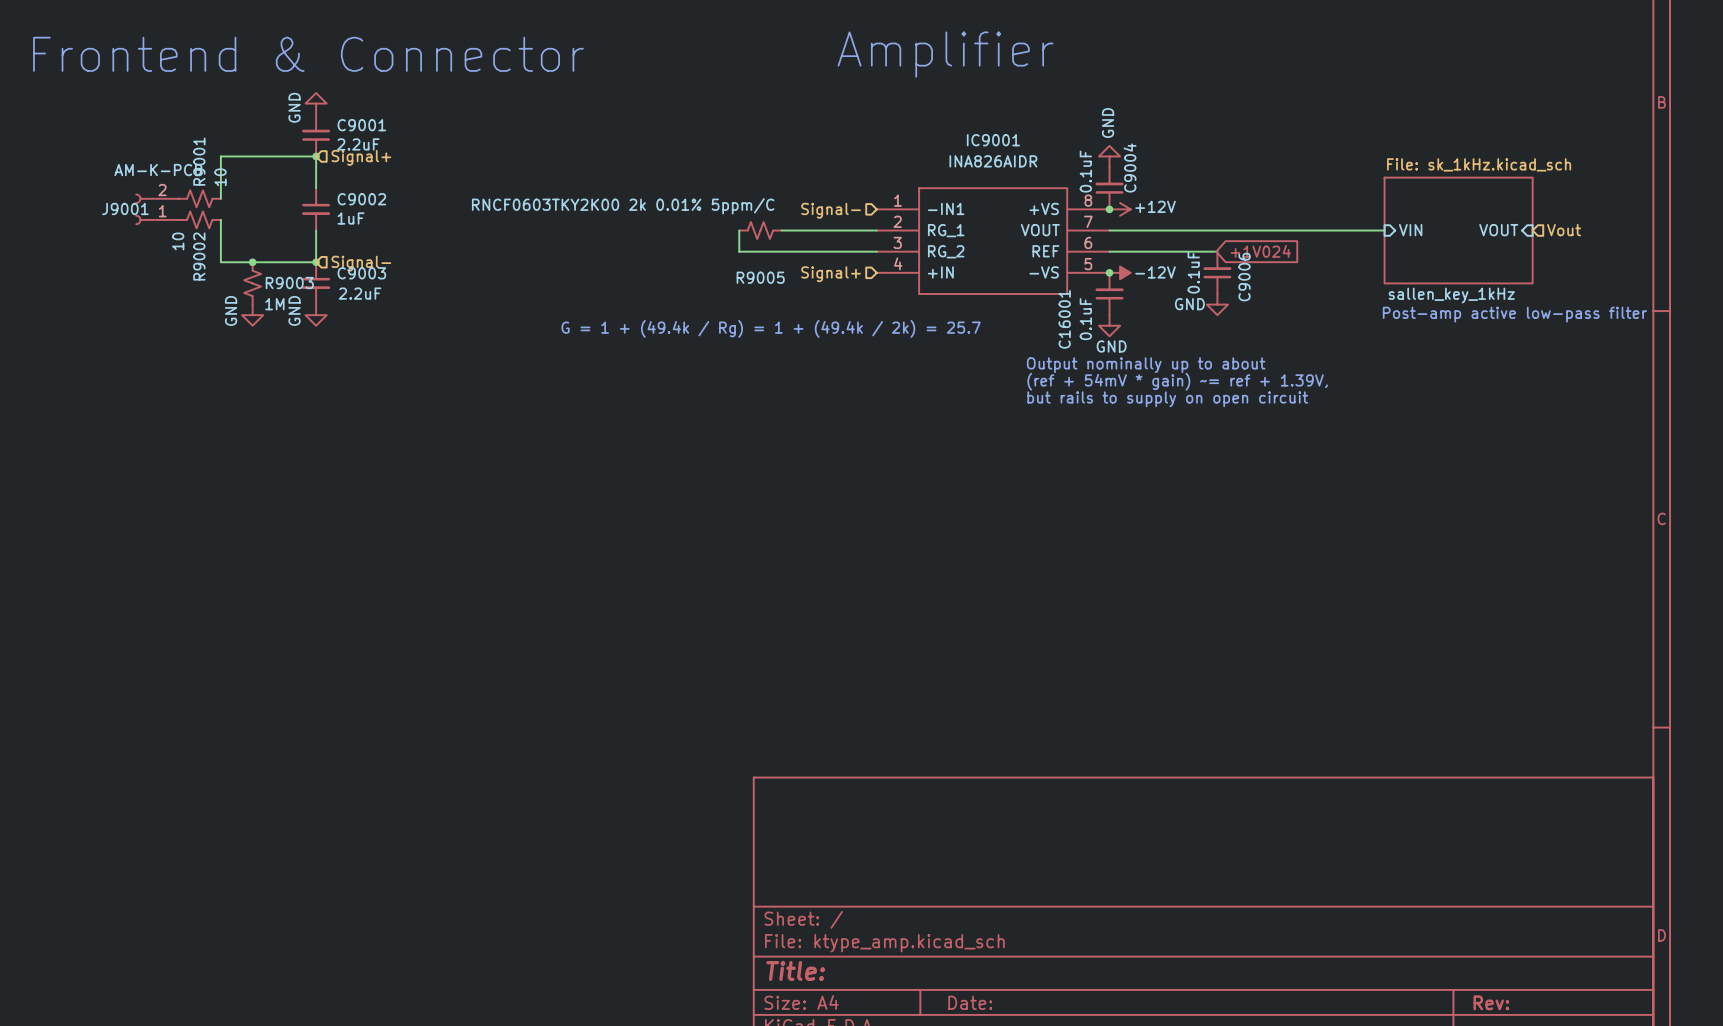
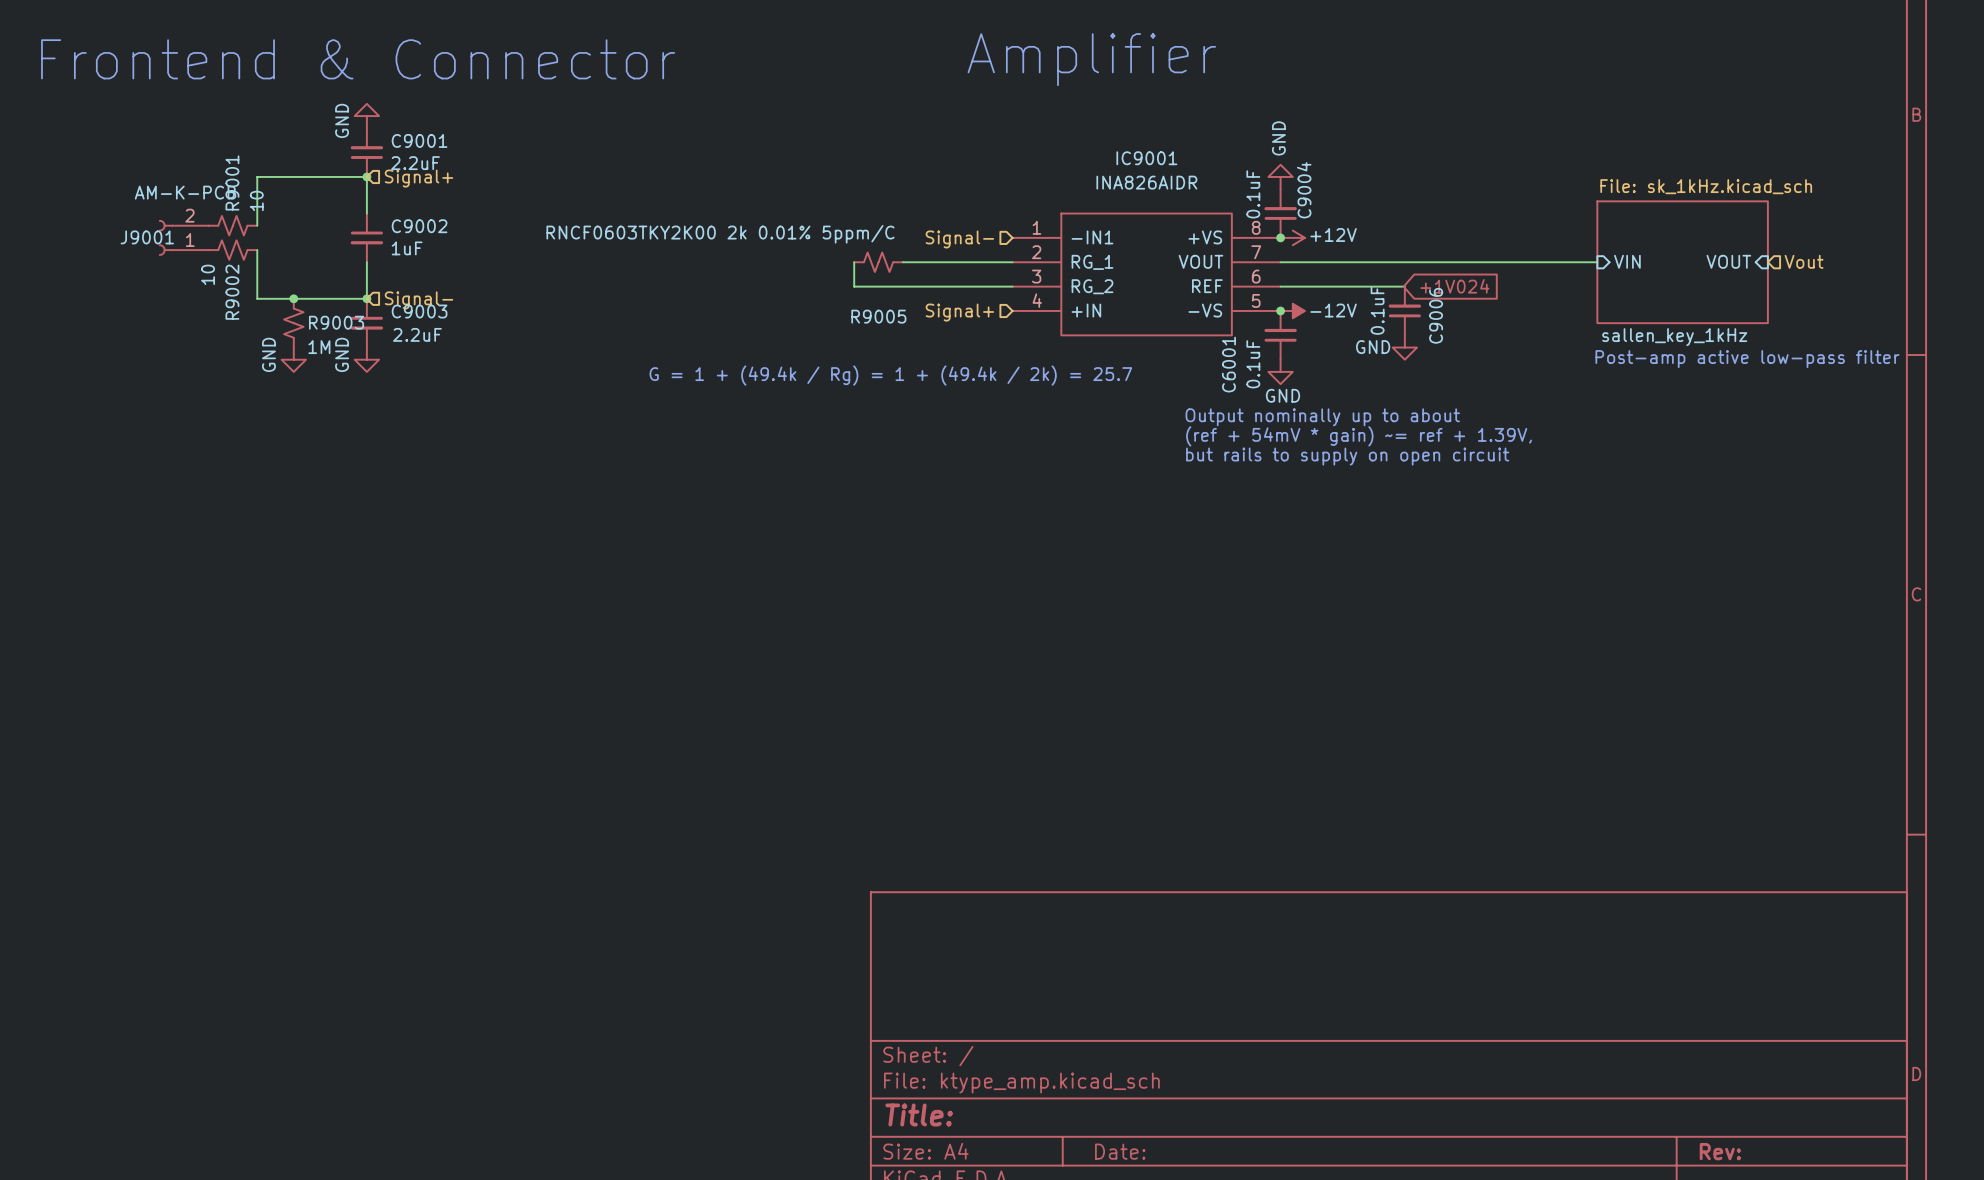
C16001 name: C16001 (1064, 319) -> C6001 (1228, 364)

